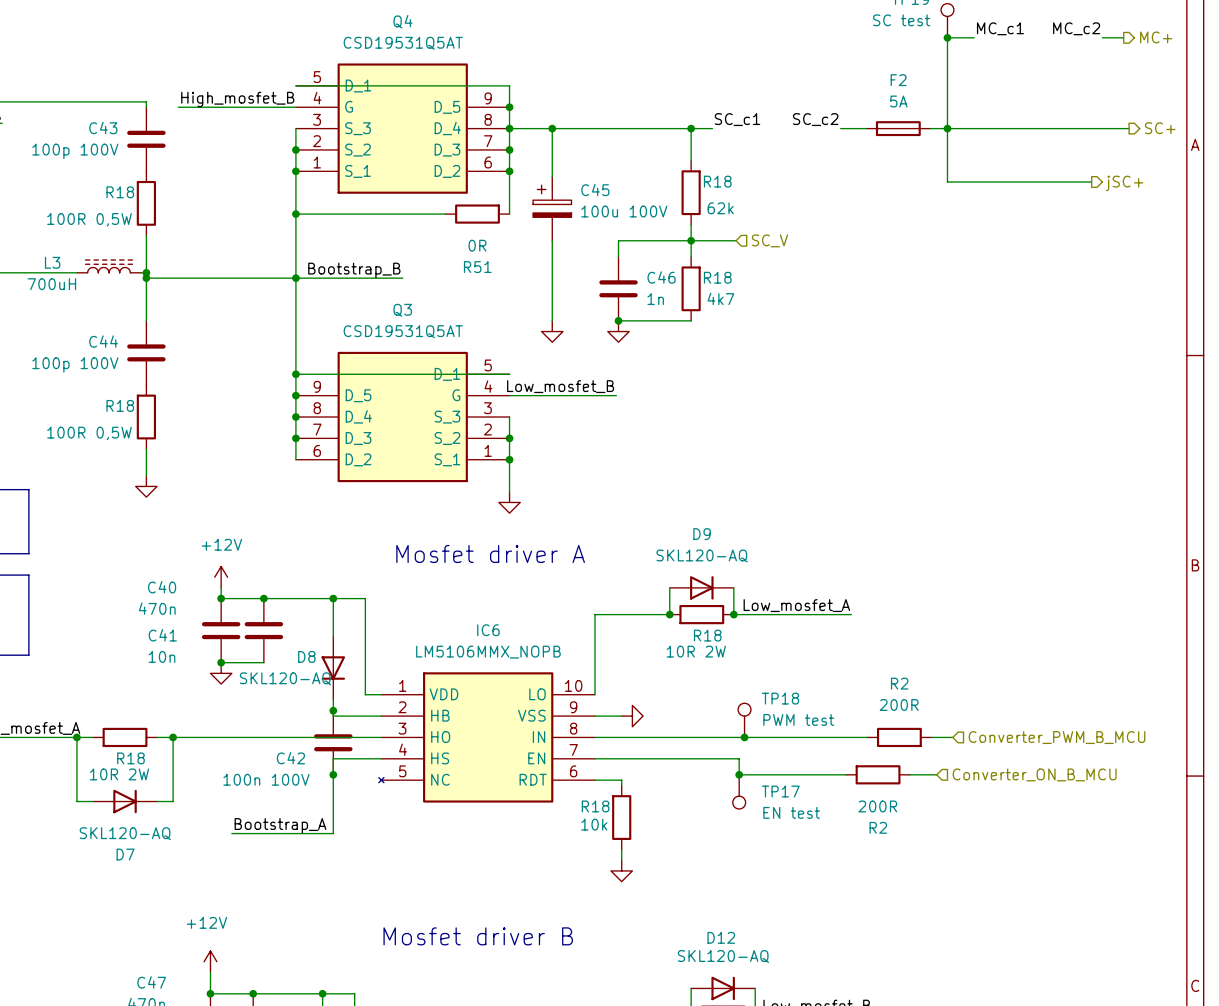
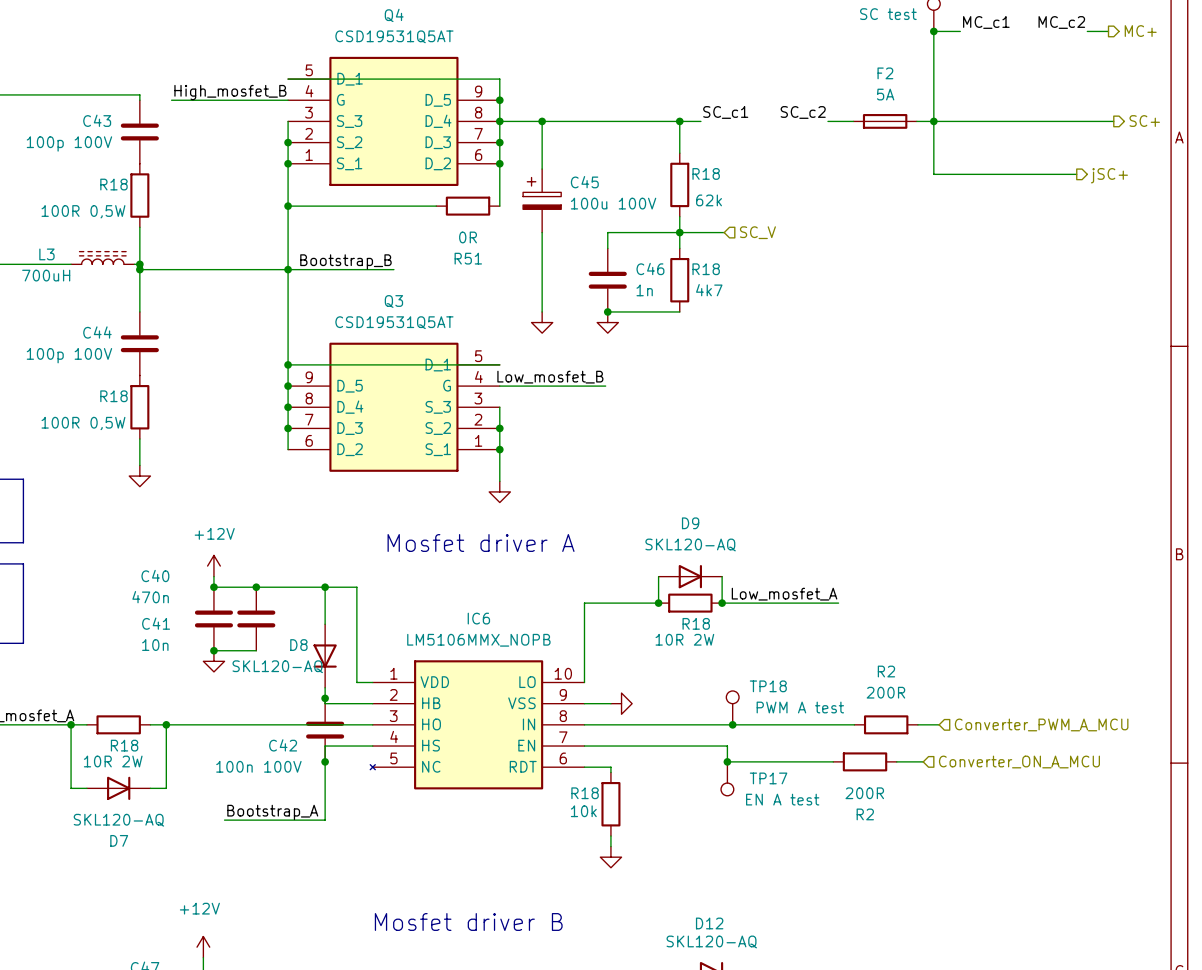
TP18 value: PWM test (798, 719) -> PWM A test (800, 707)
hierarchical label: Converter_PWM_B_MCU (1057, 737) -> Converter_PWM_A_MCU (1041, 724)
hierarchical label: Converter_ON_B_MCU (1034, 774) -> Converter_ON_A_MCU (1019, 762)
TP17 value: EN test (791, 812) -> EN A test (782, 799)

